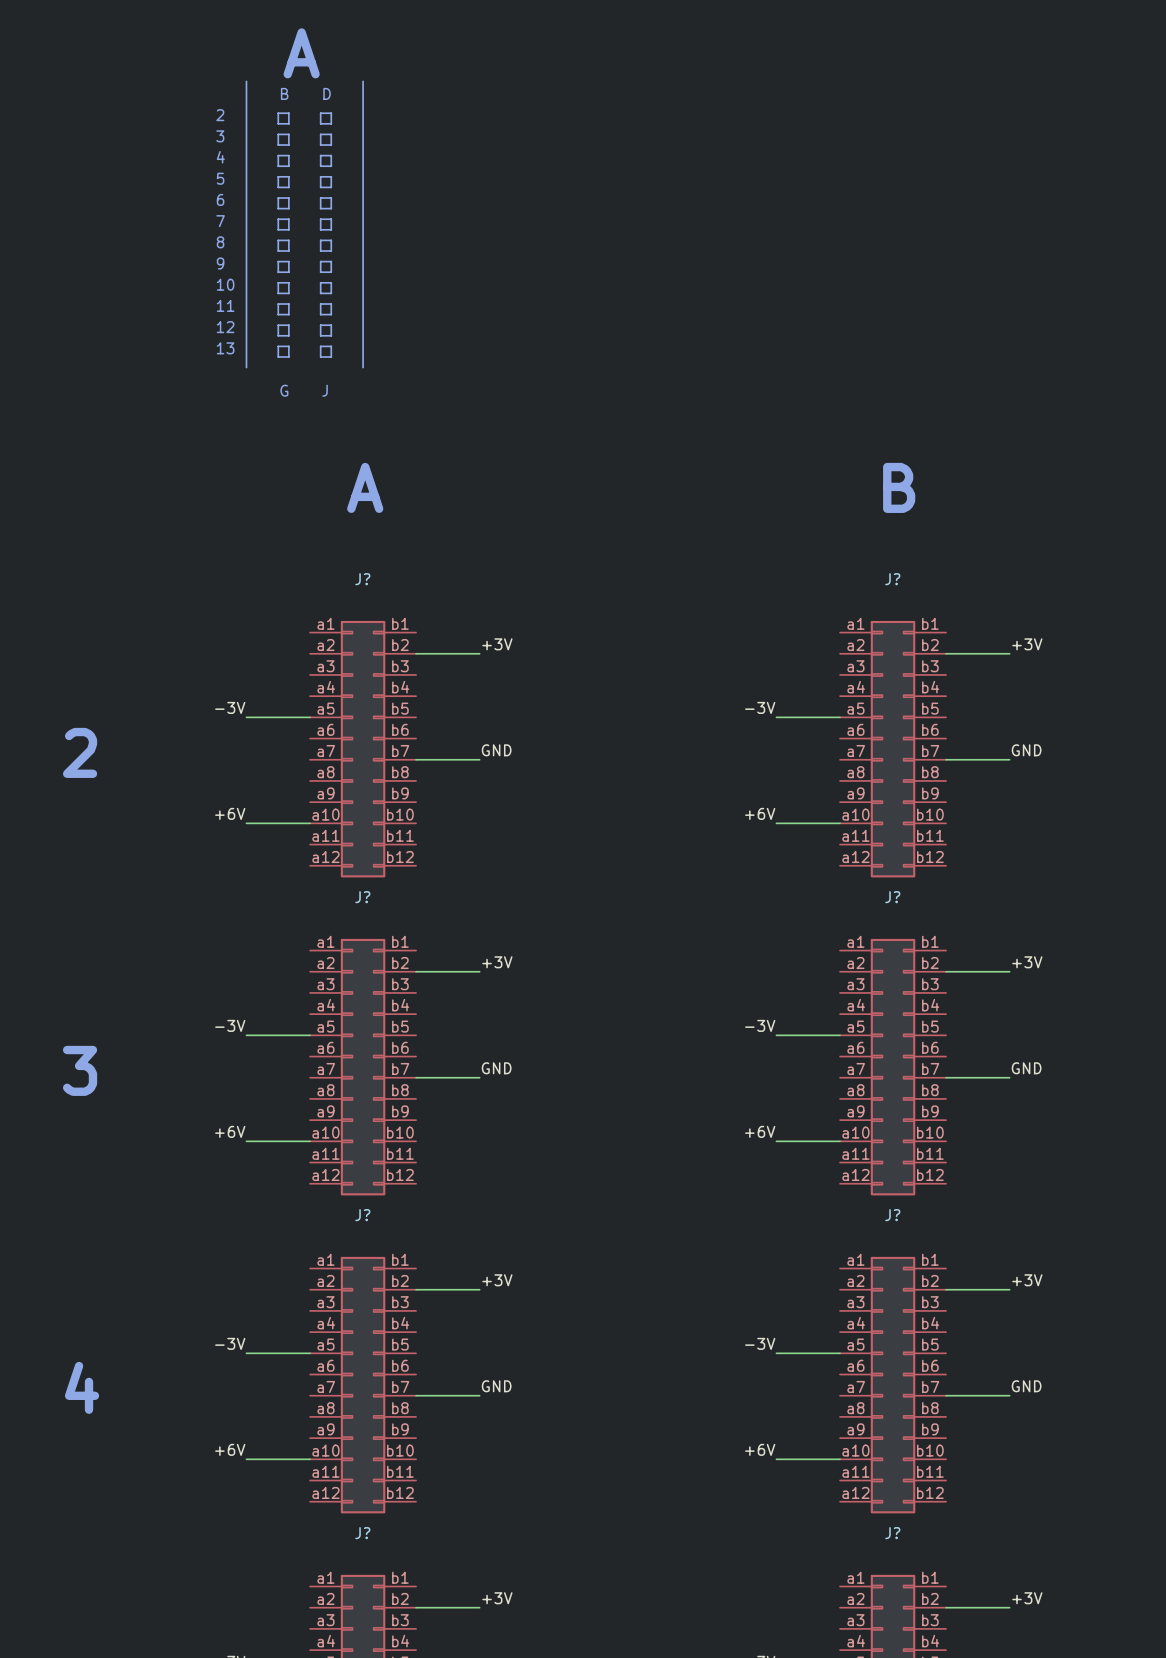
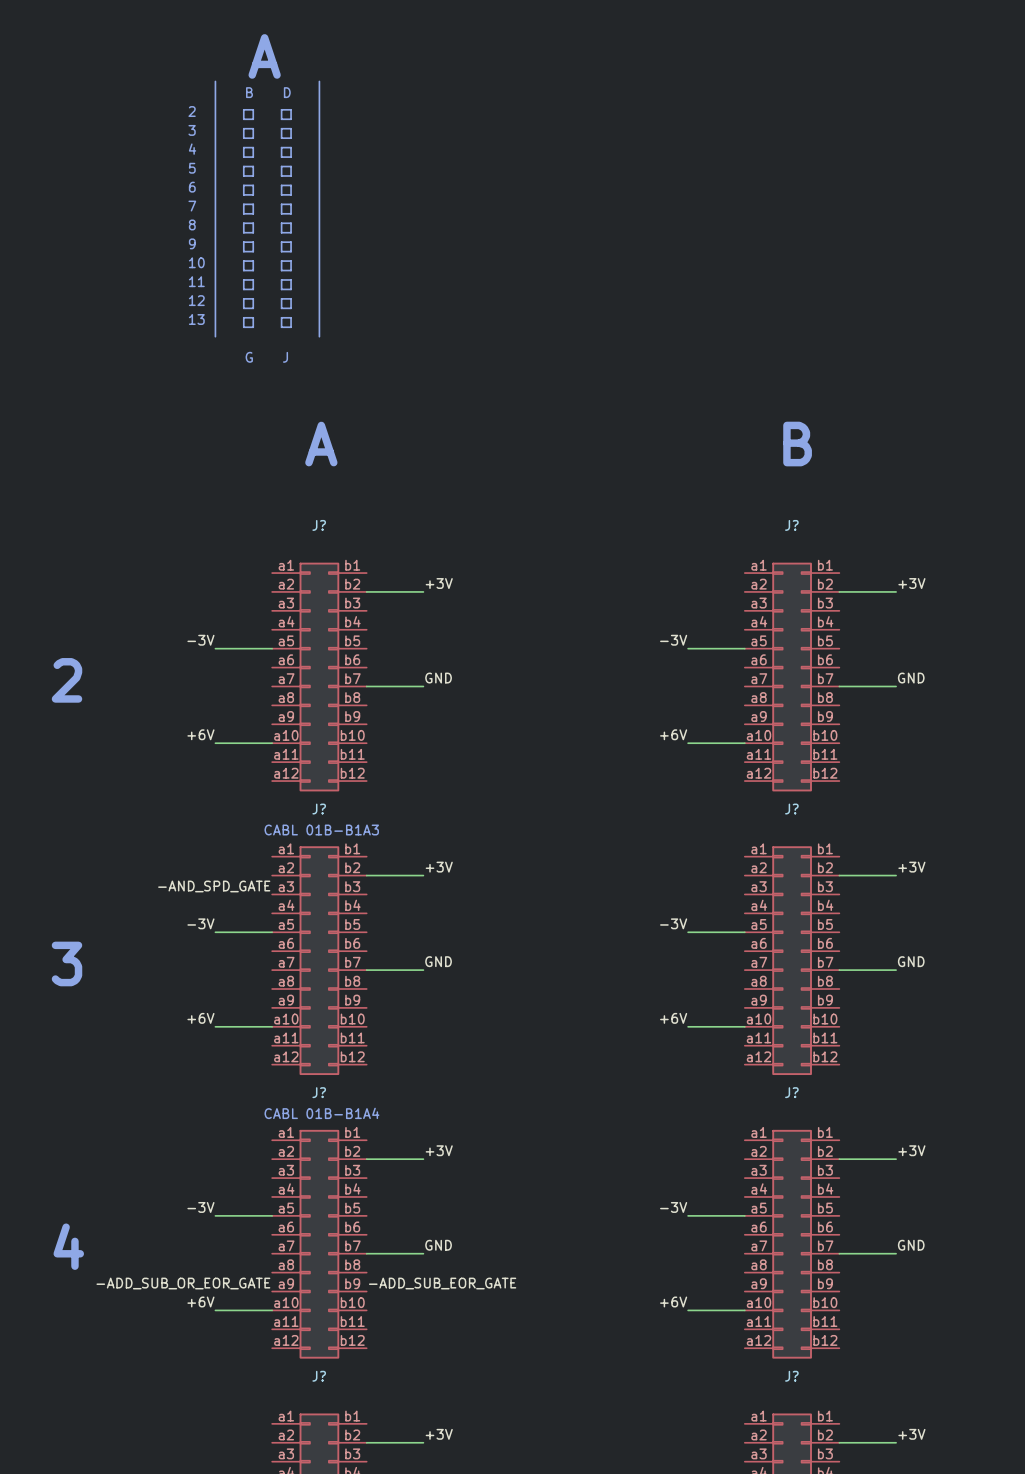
text: none -> CABL 01B-B1A3 (321, 830)
label: none -> -AND_SPD_GATE (214, 886)
text: none -> CABL 01B-B1A4 (321, 1113)
label: none -> -ADD_SUB_OR_EOR_GATE (183, 1283)
label: none -> -ADD_SUB_EOR_GATE (442, 1283)

